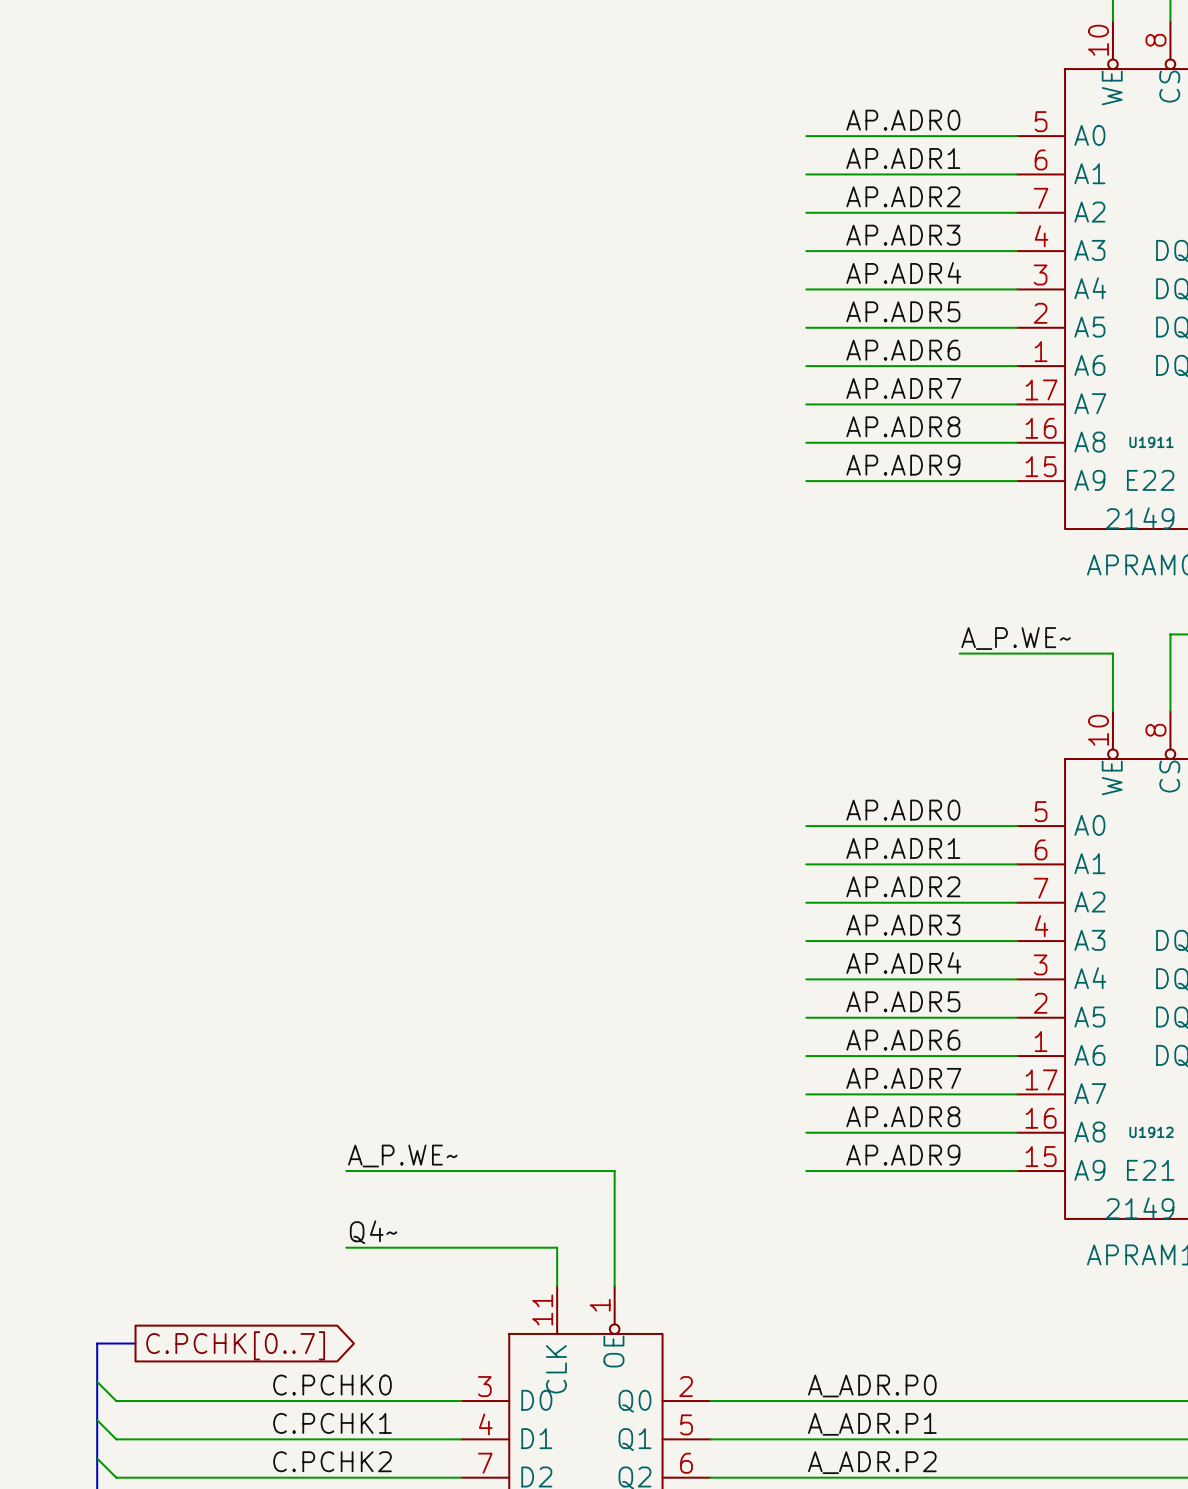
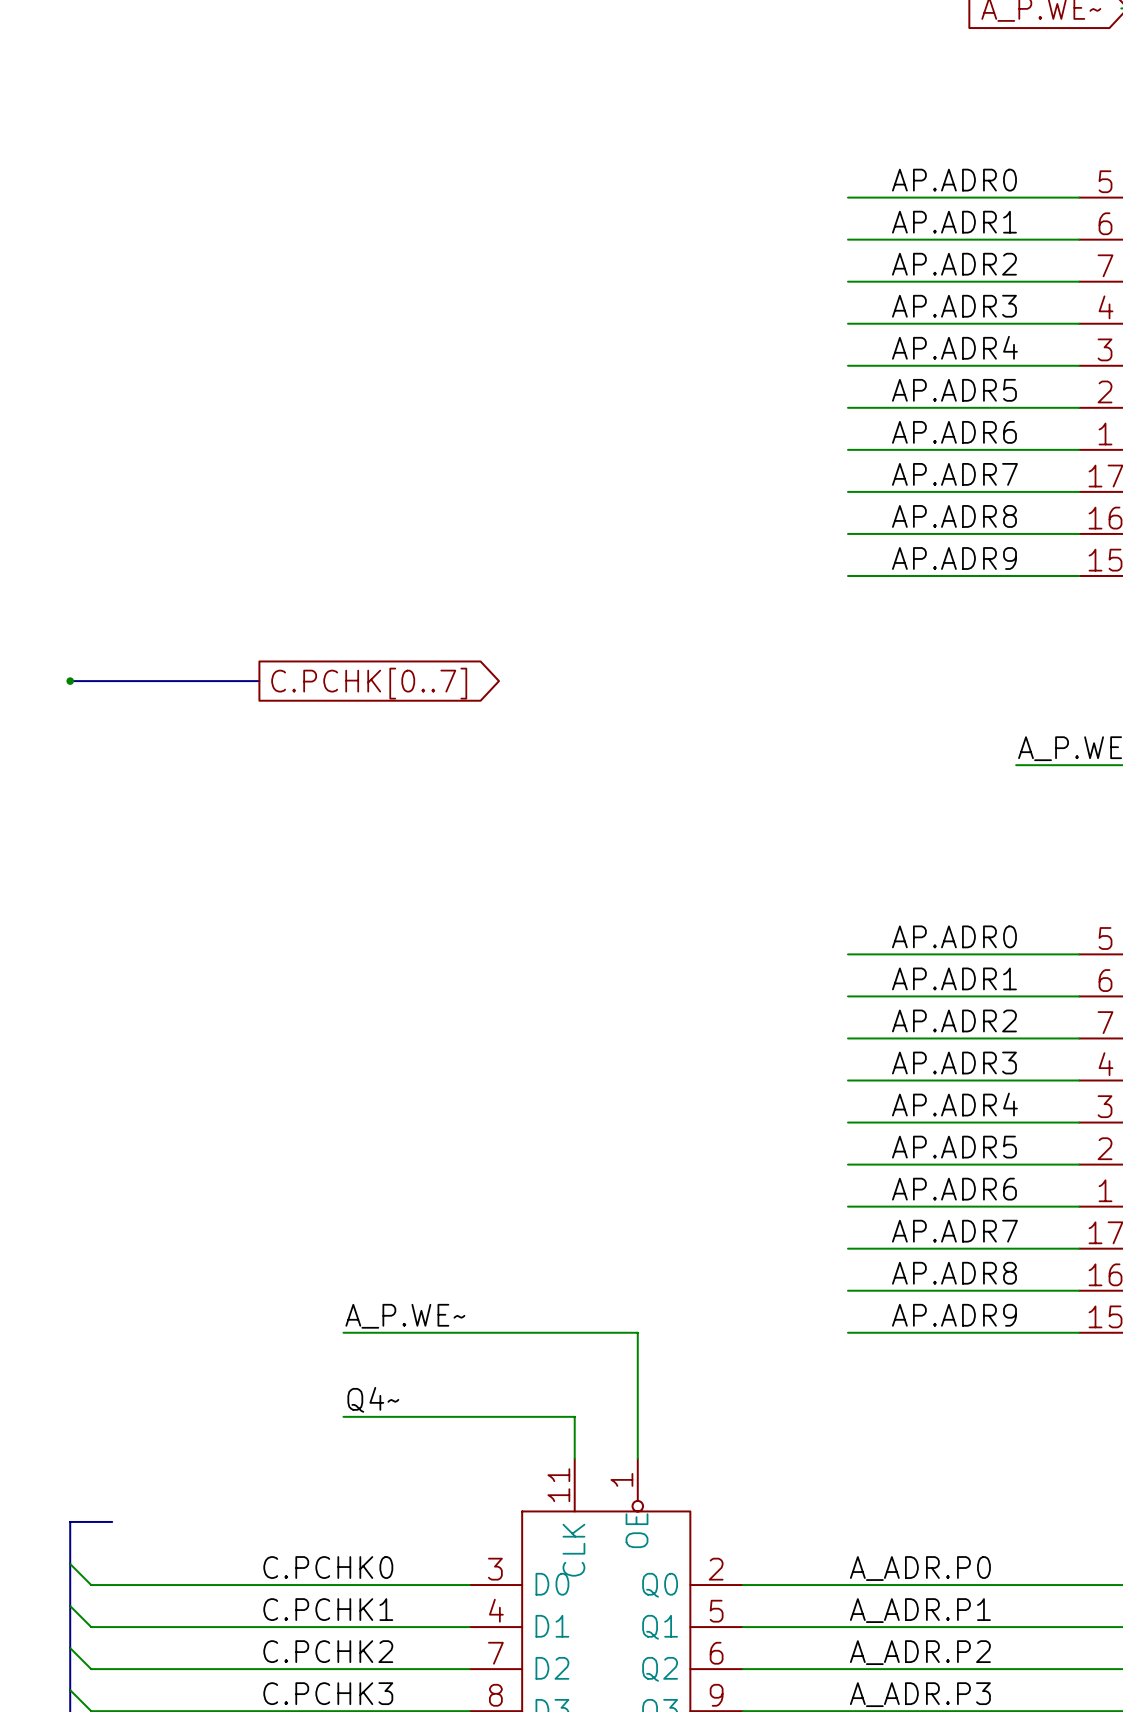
bus: none -> (70, 681) (259, 681)
junction: none -> (70, 681)
global label: none -> C.PCHK[0..7] (369, 683)
global label: C.PCHK[0..7] (235, 1345) -> none

